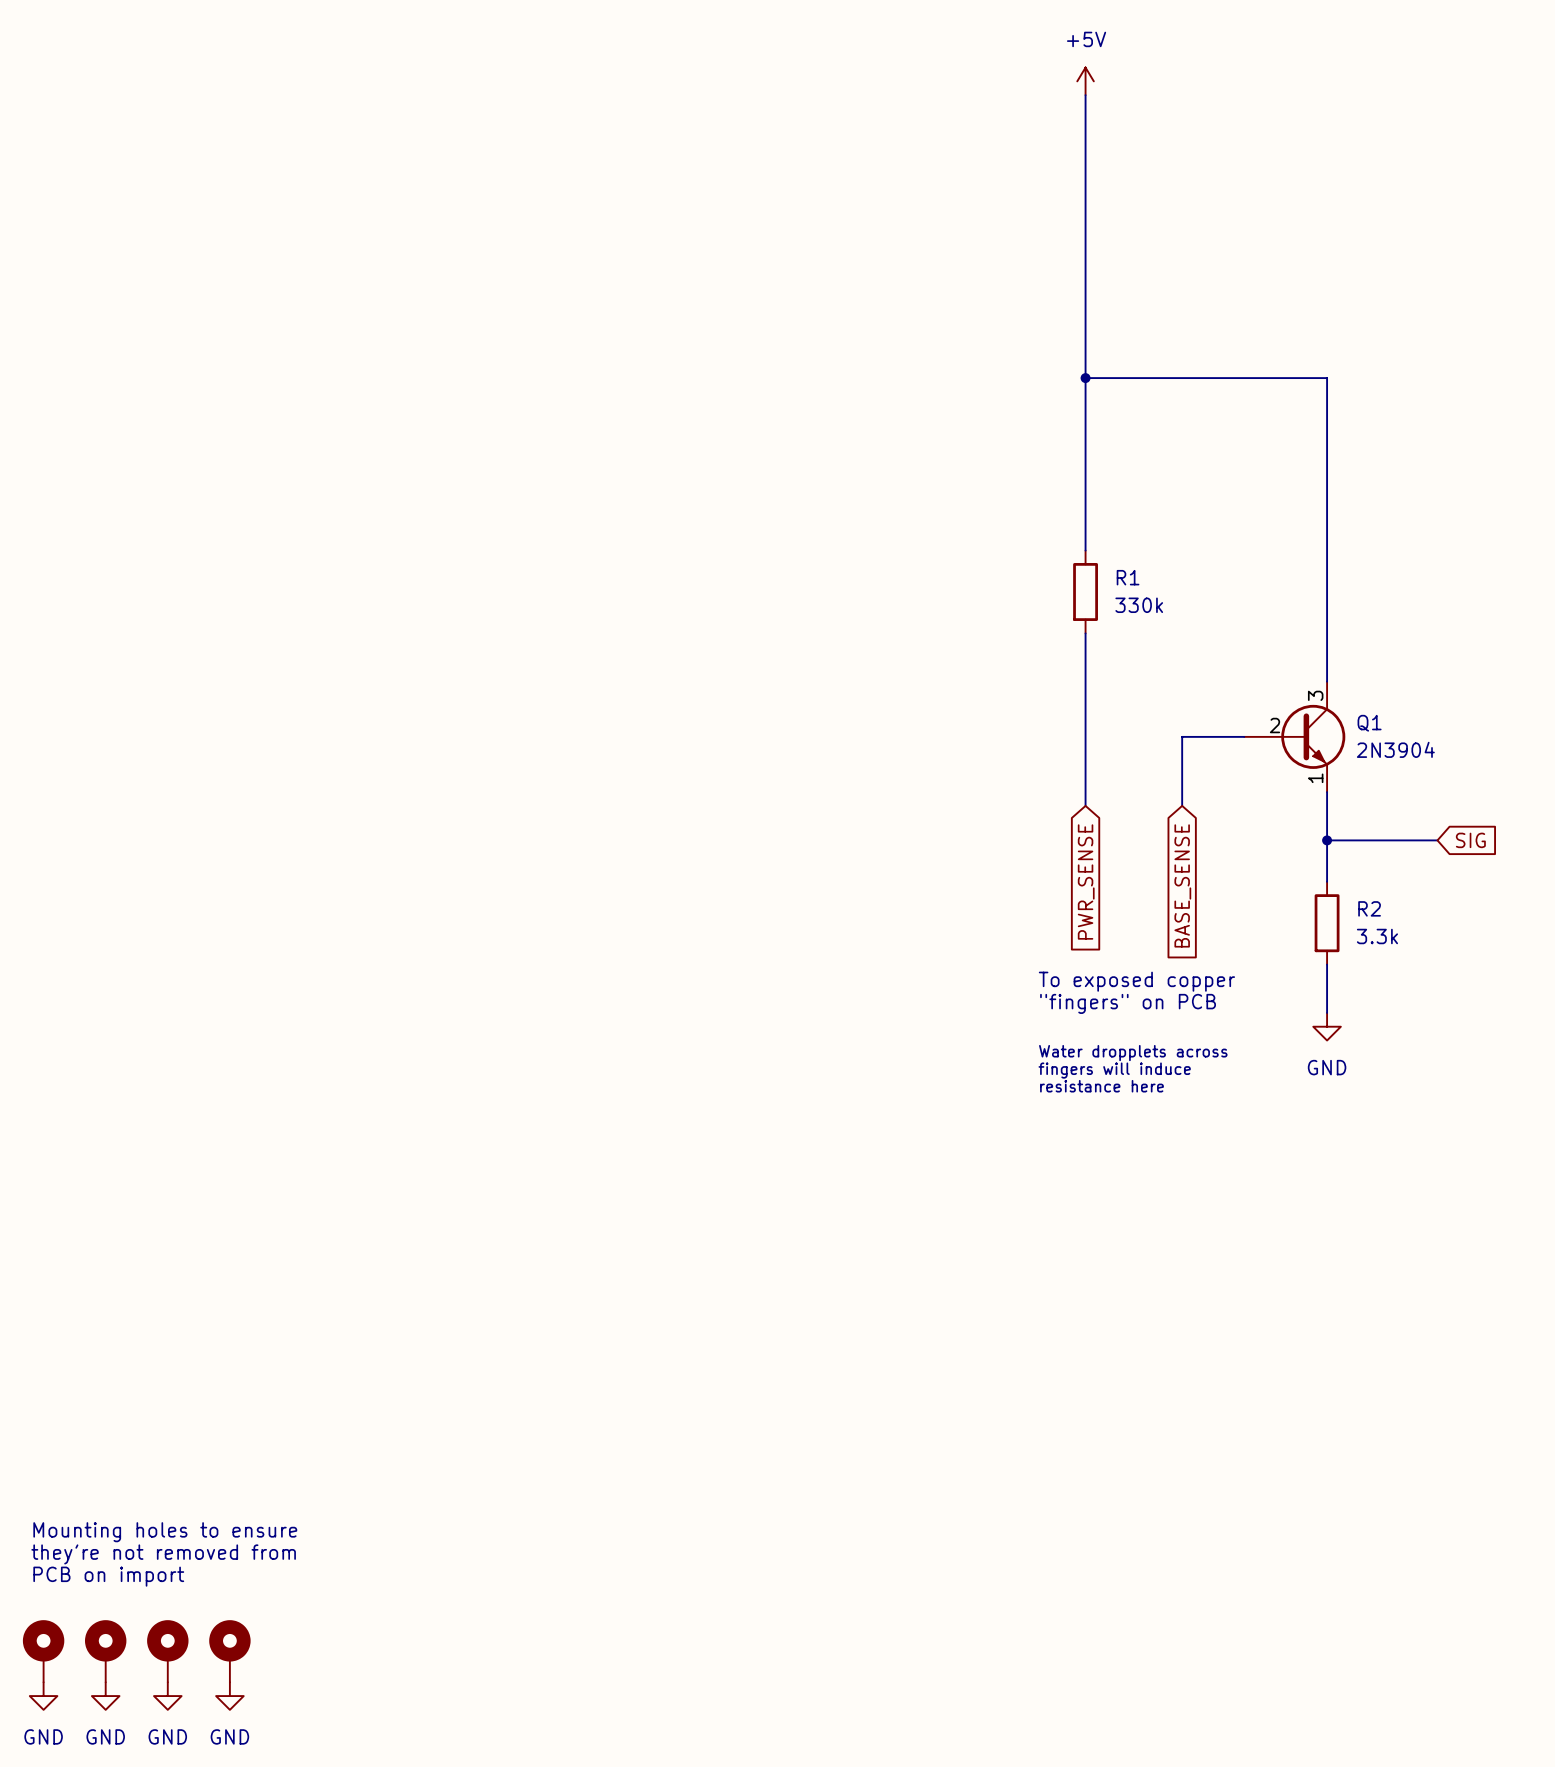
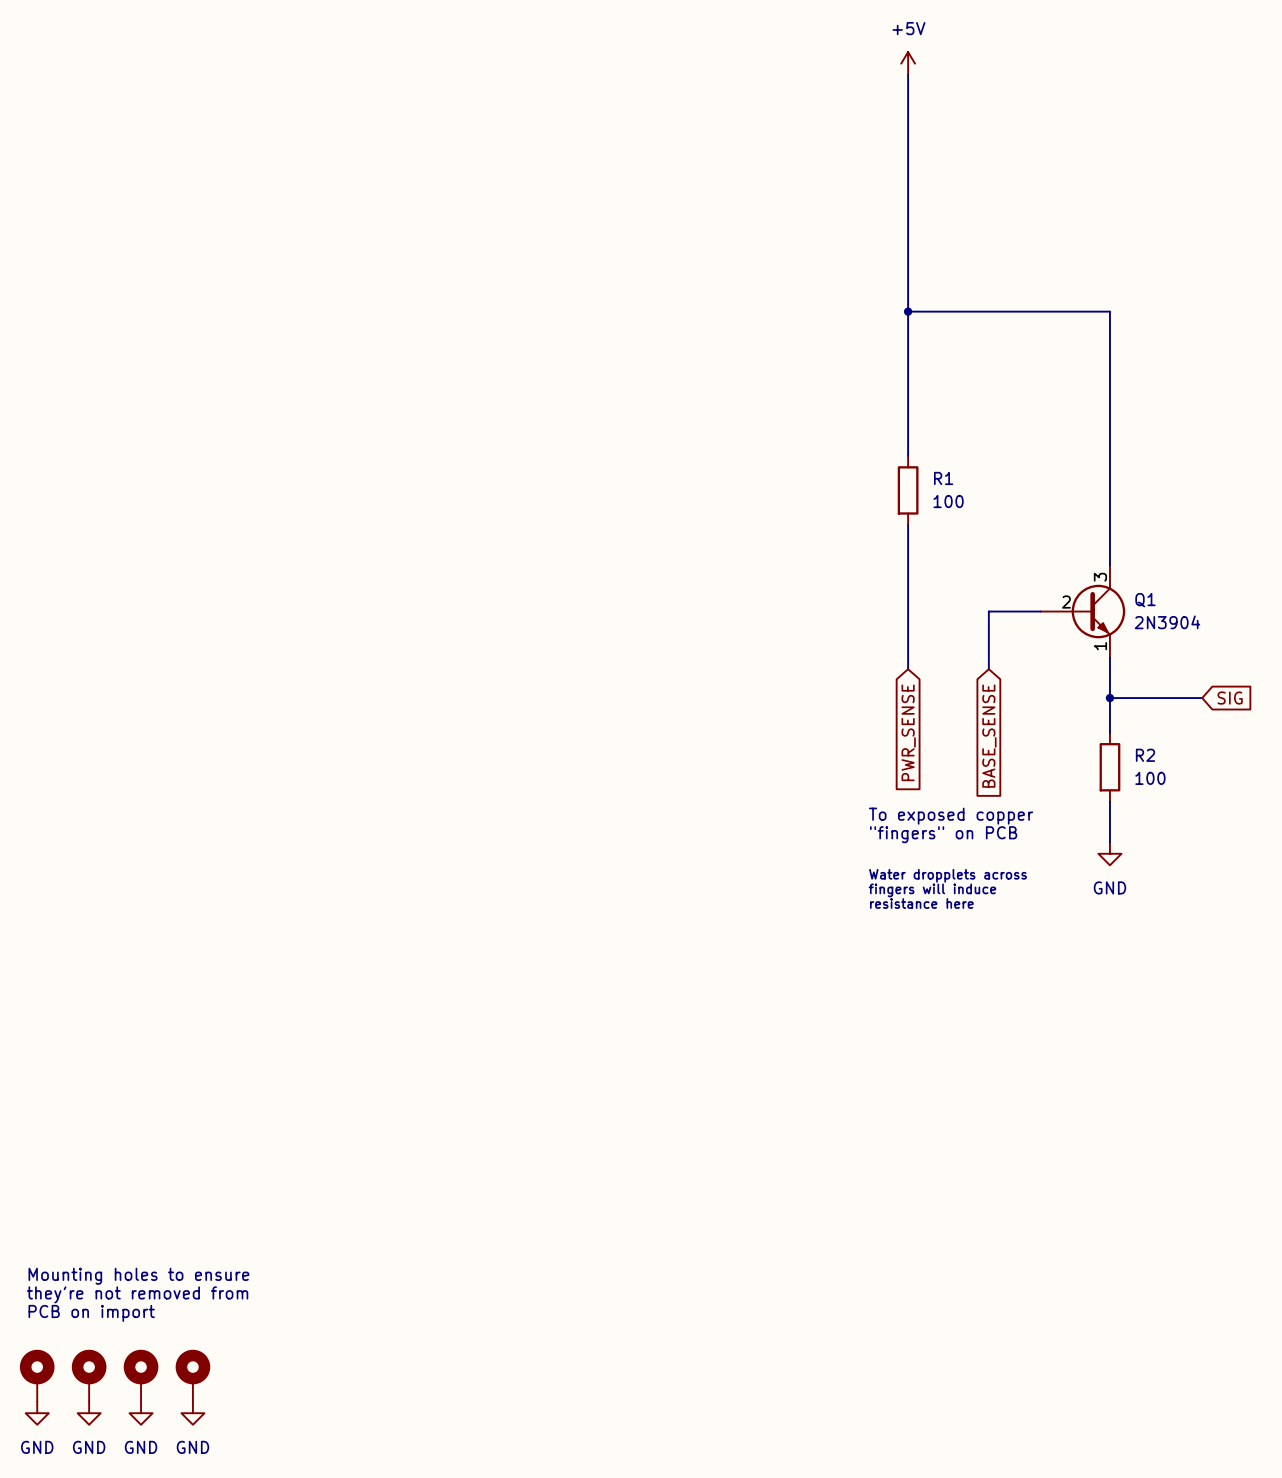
R1 value: 330k (1139, 605) -> 100 (948, 501)
R2 value: 3.3k (1377, 936) -> 100 (1150, 778)

